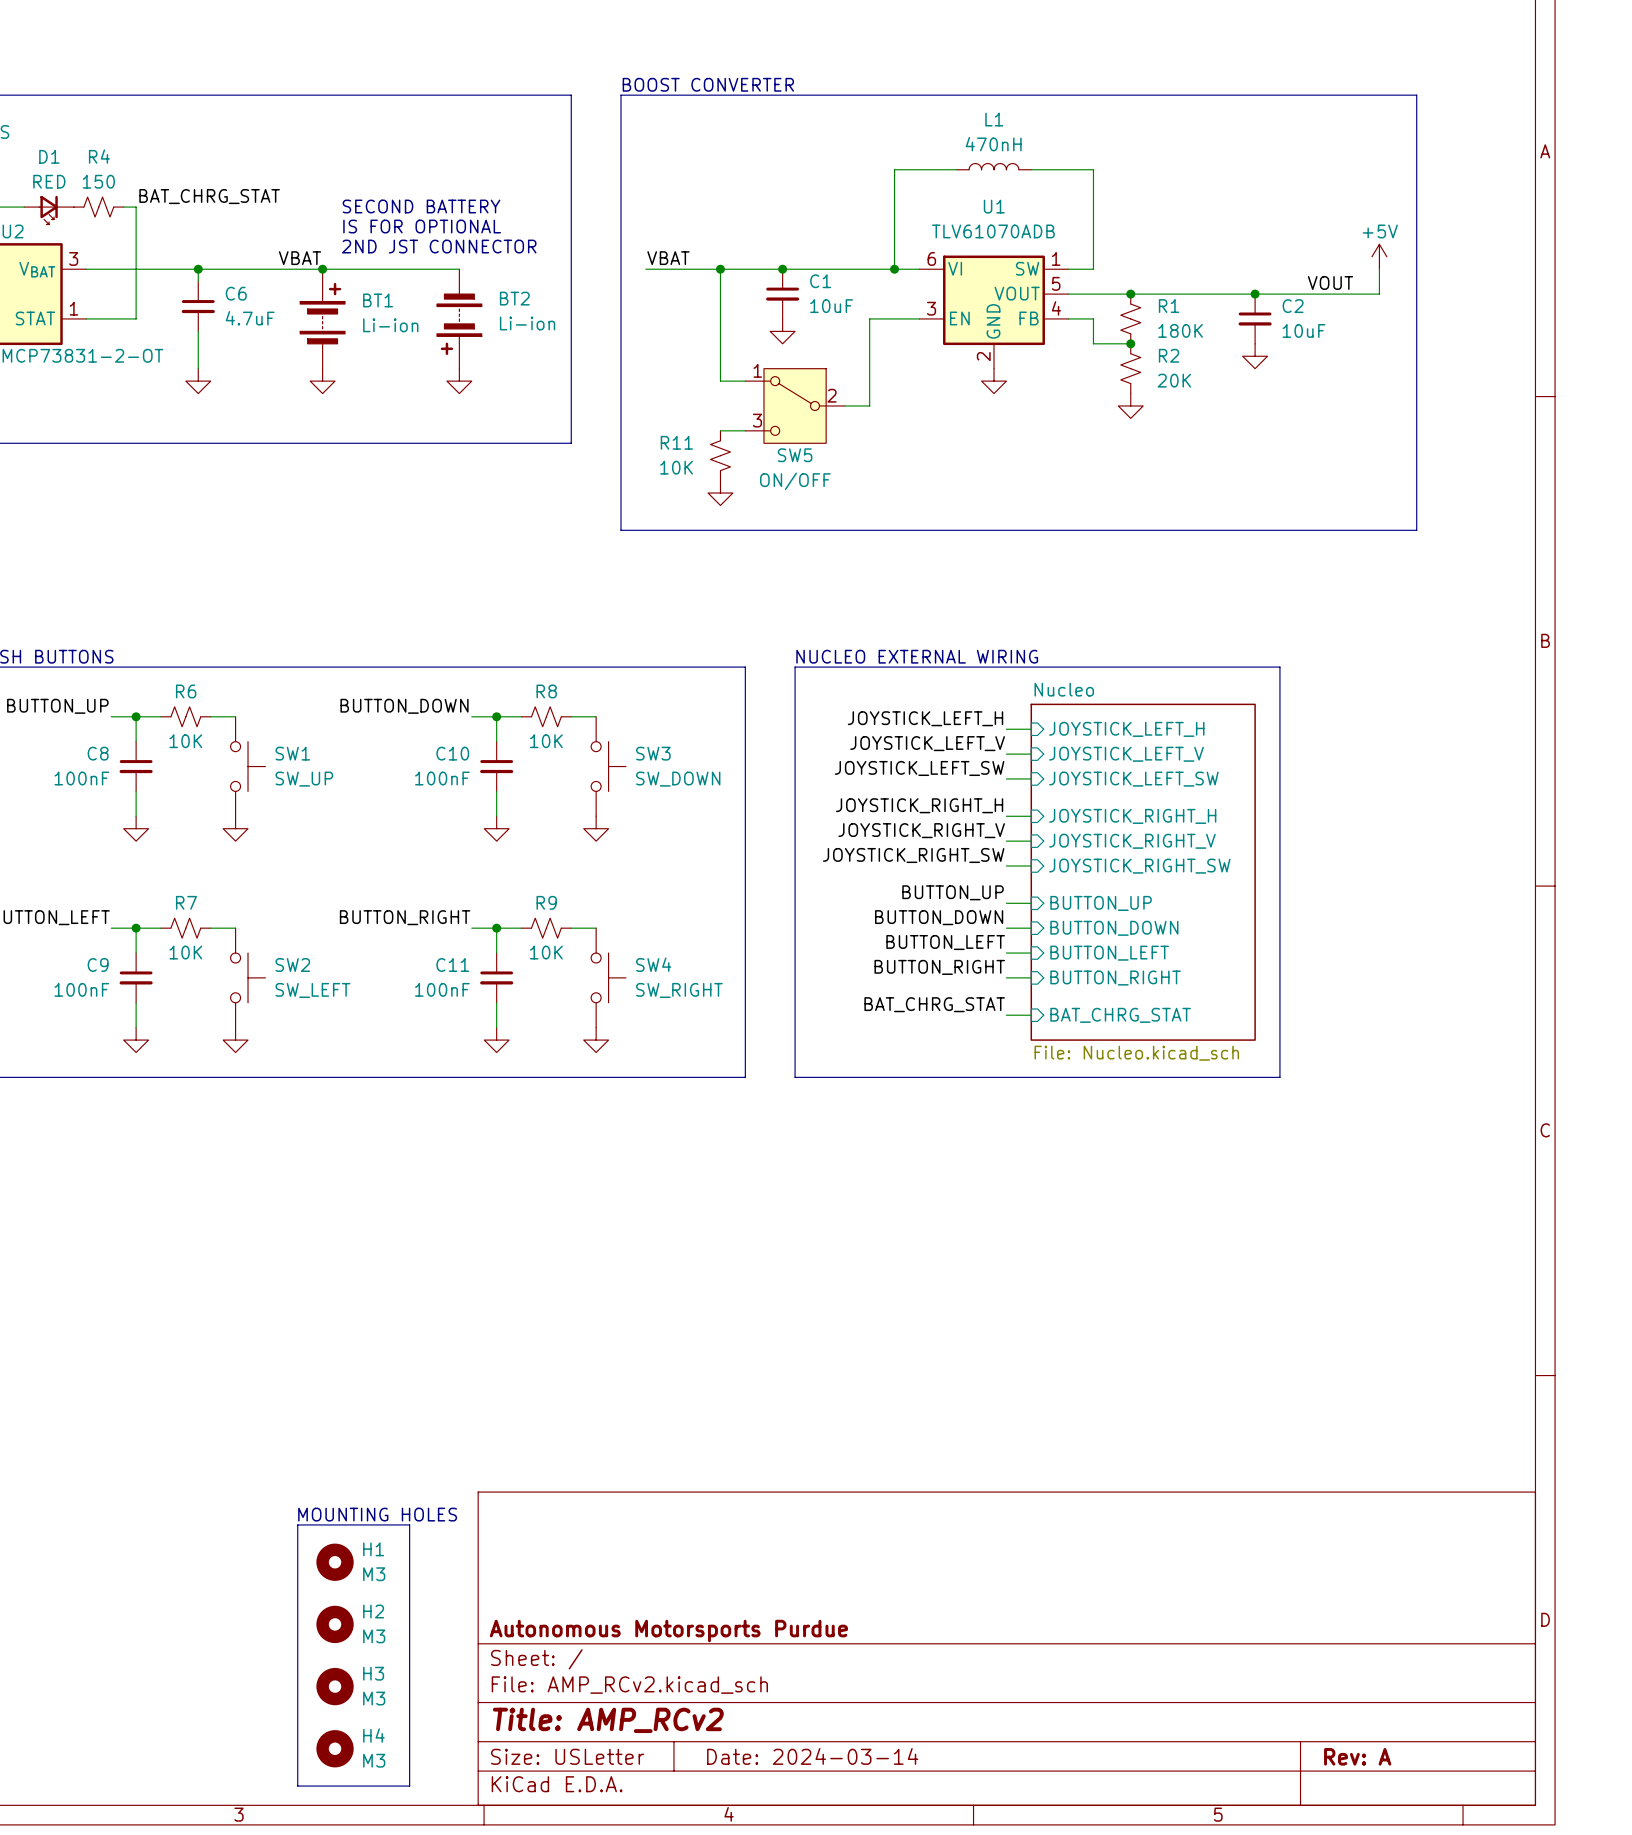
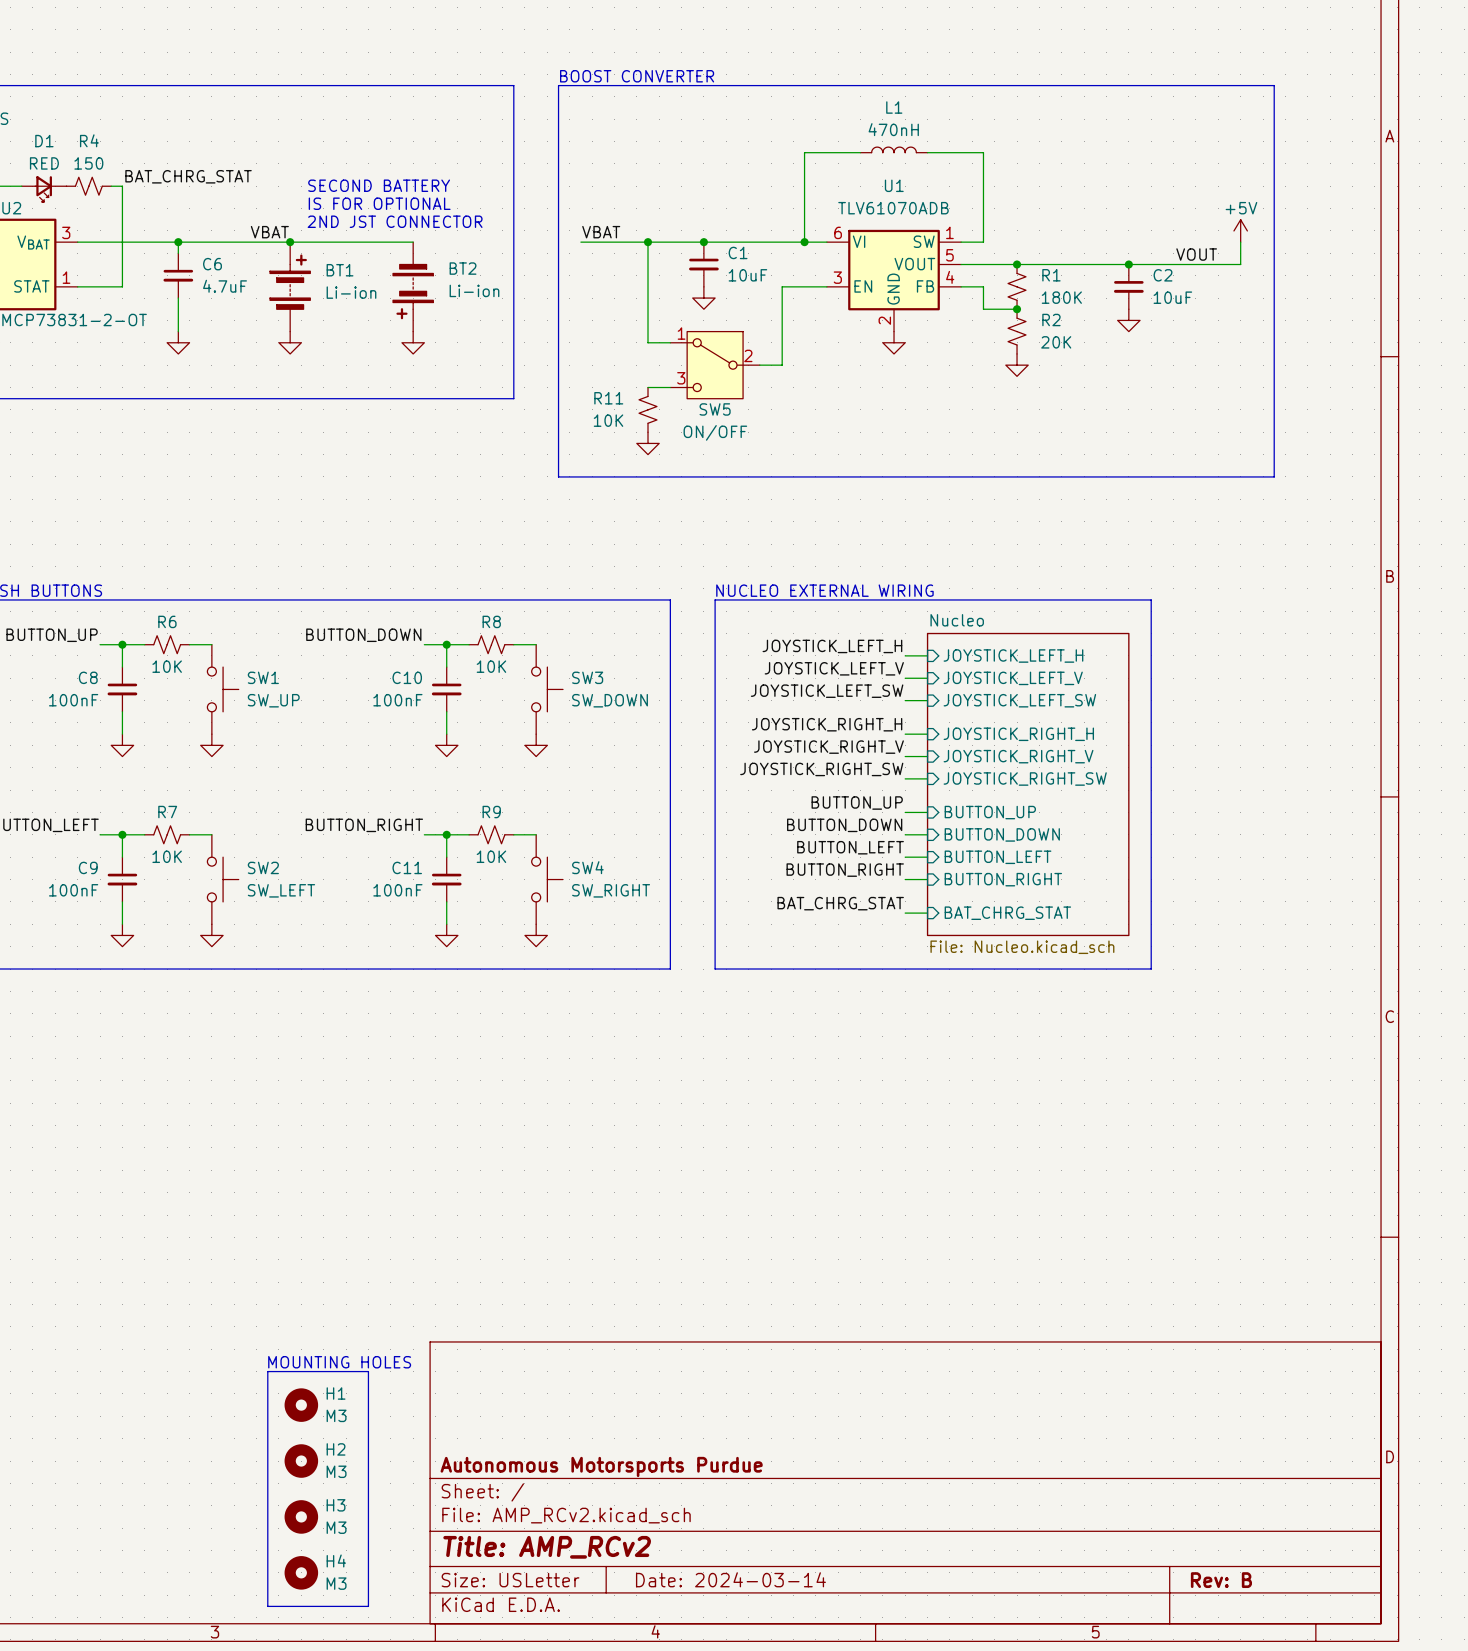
title block: Rev: A (1357, 1756) -> Rev: B (1221, 1580)

